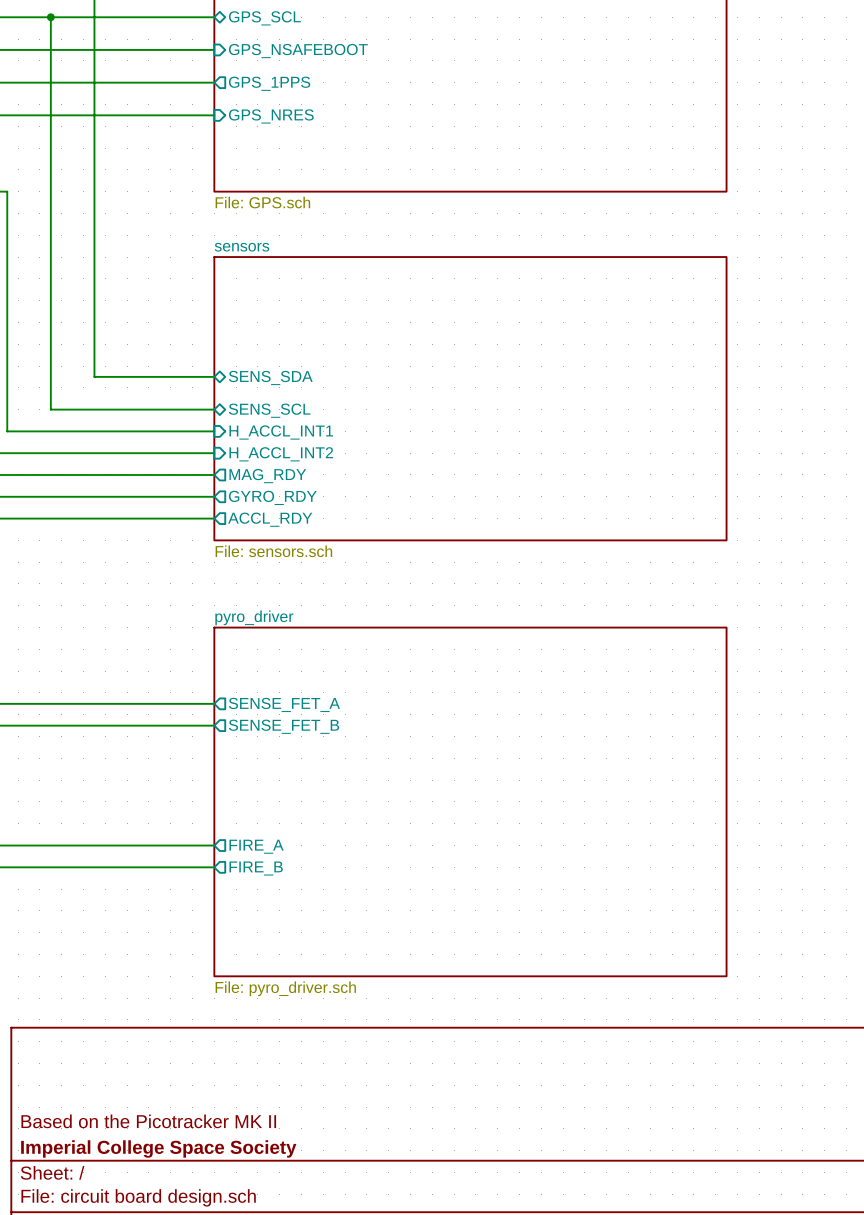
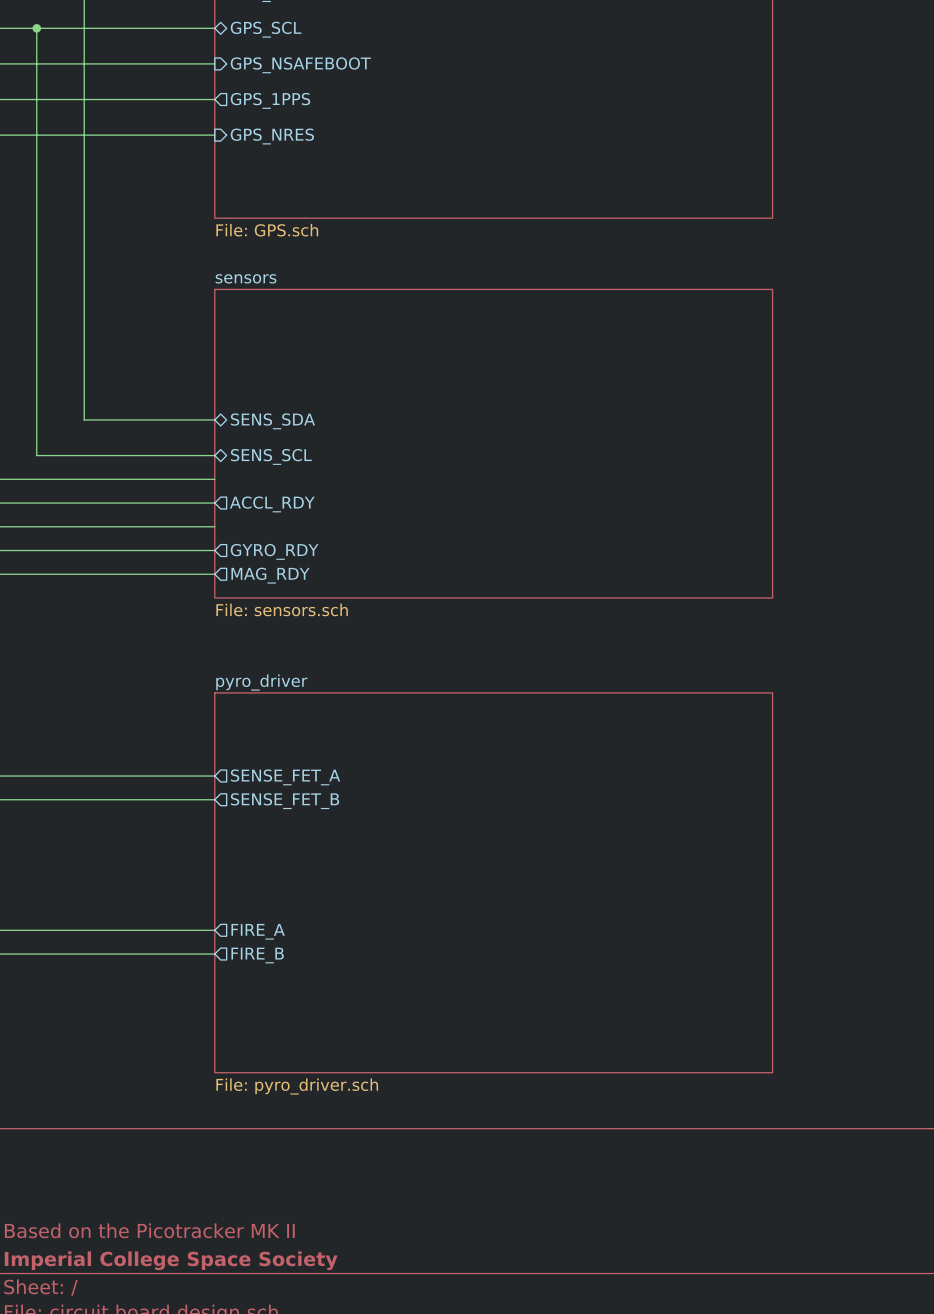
sheet pin: H_ACCL_INT1 (281, 432) -> none
sheet pin shape: input (281, 454) -> output (272, 504)
sheet pin: H_ACCL_INT2 (281, 454) -> ACCL_RDY (272, 504)
sheet pin: MAG_RDY (267, 476) -> none
sheet pin: ACCL_RDY (270, 519) -> MAG_RDY (270, 575)

